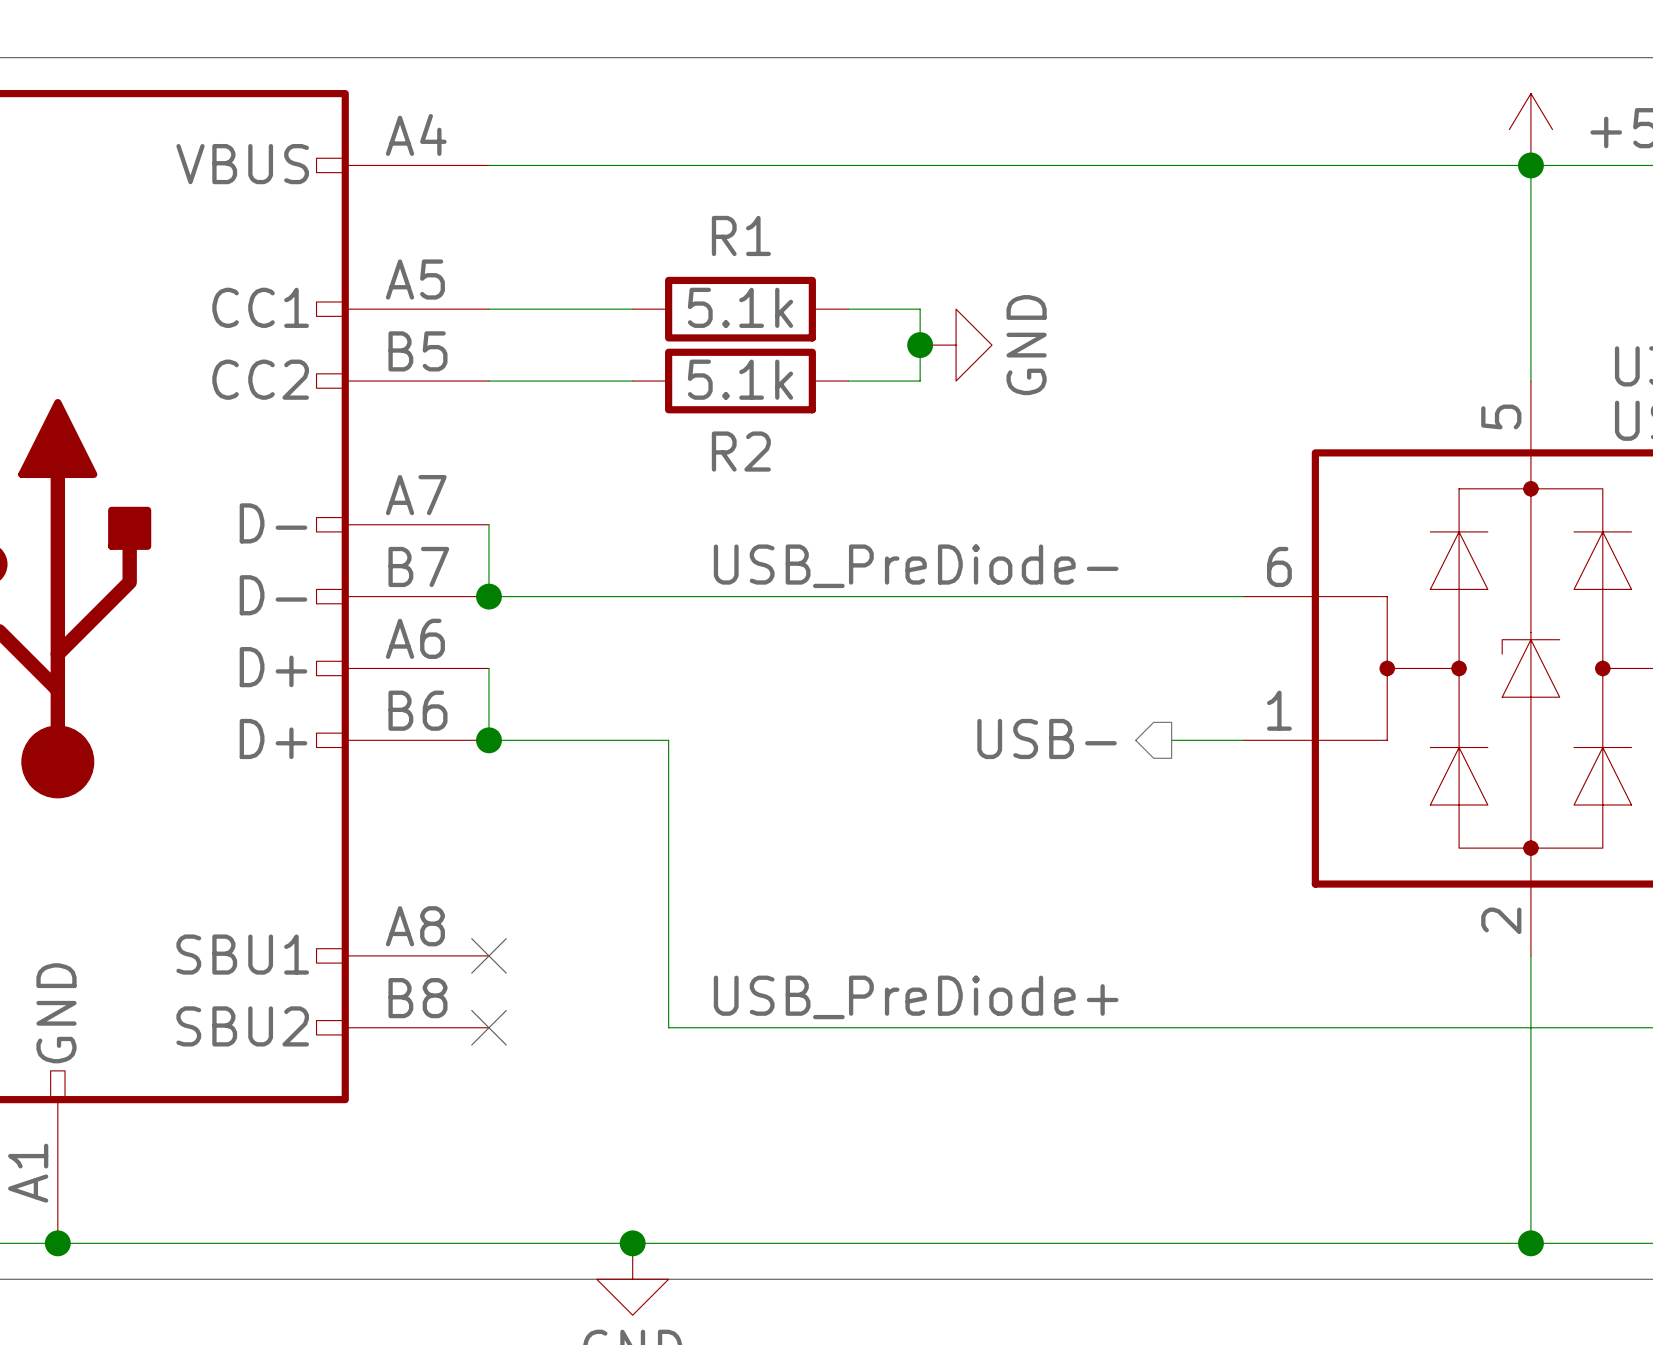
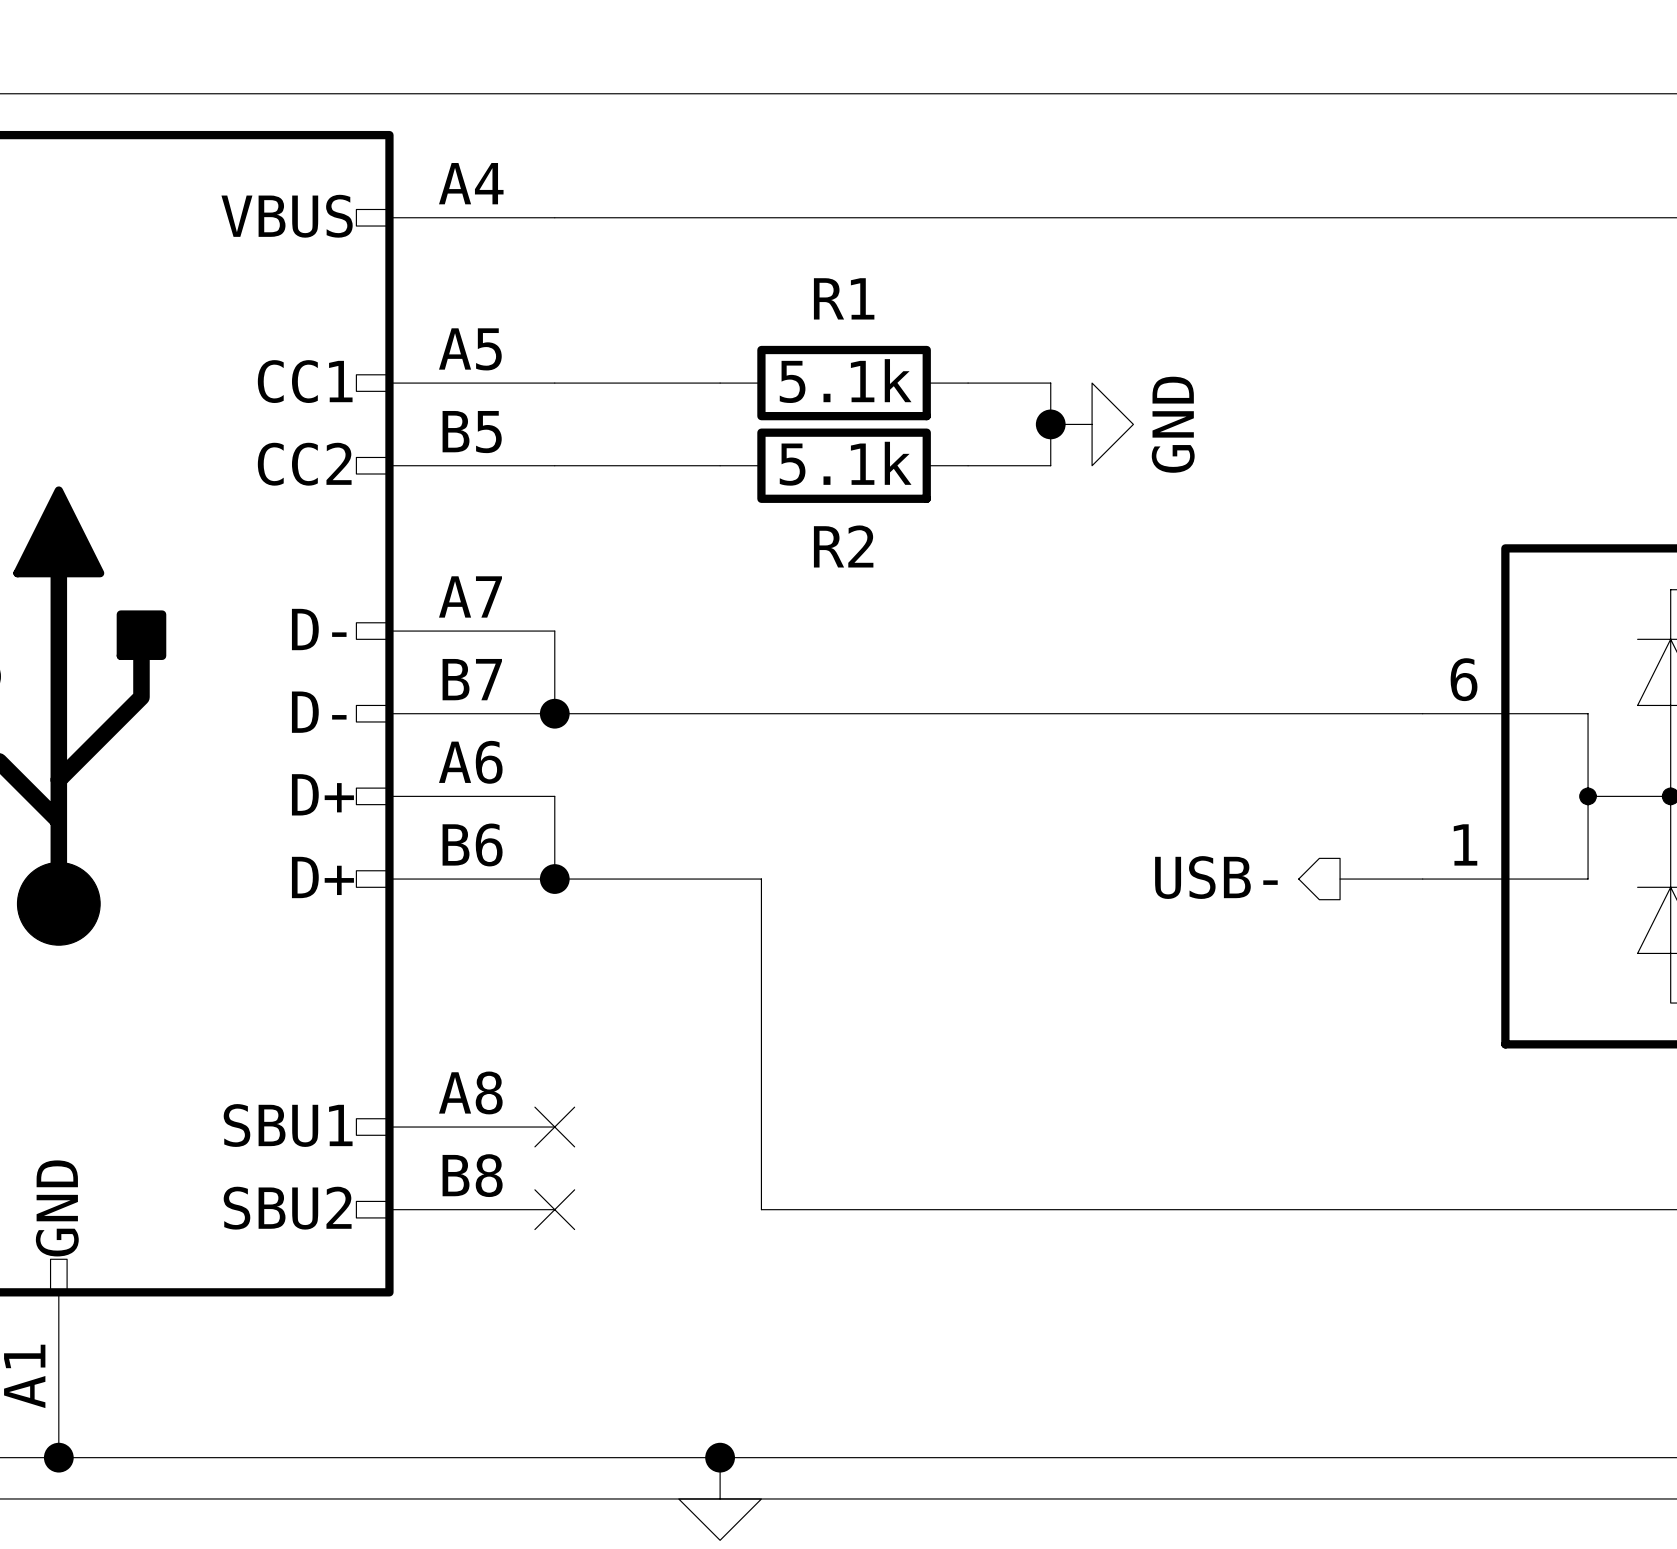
label: USB_PreDiode- (916, 566) -> none
label: USB_PreDiode+ (916, 997) -> none

